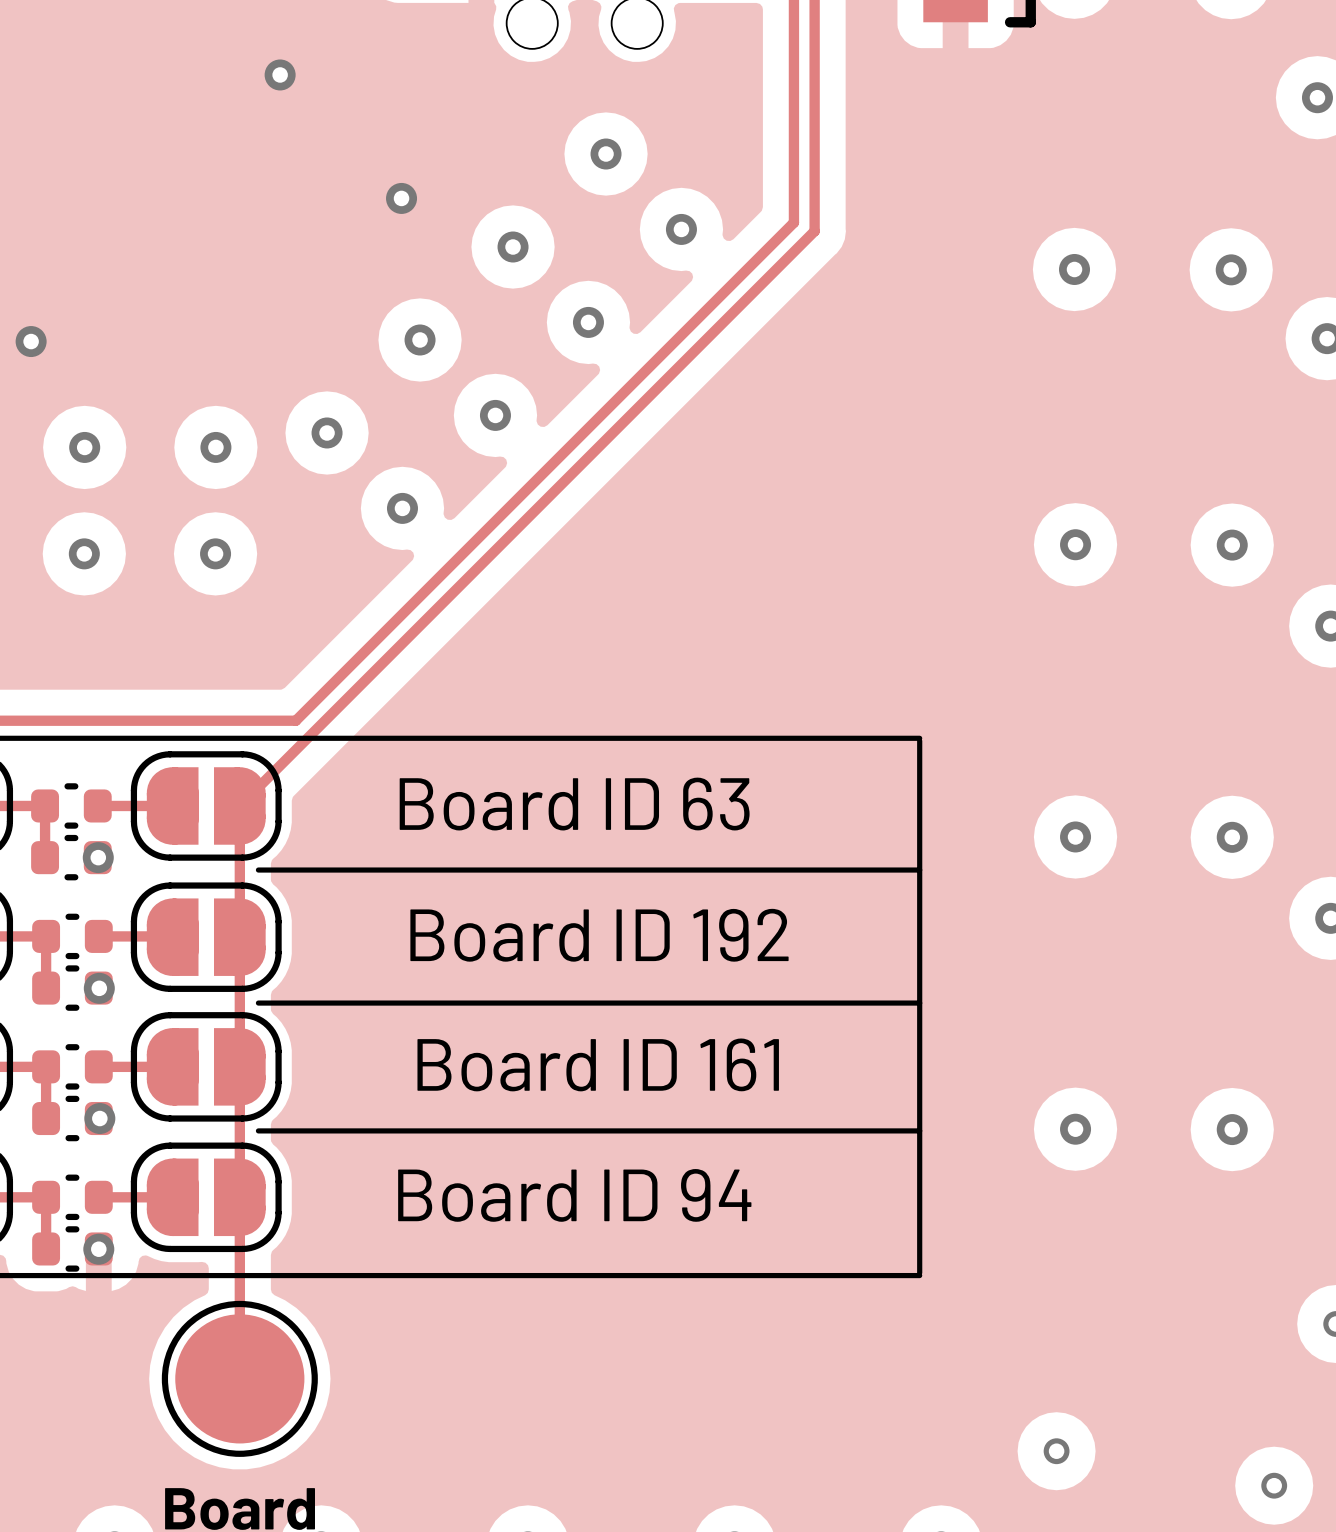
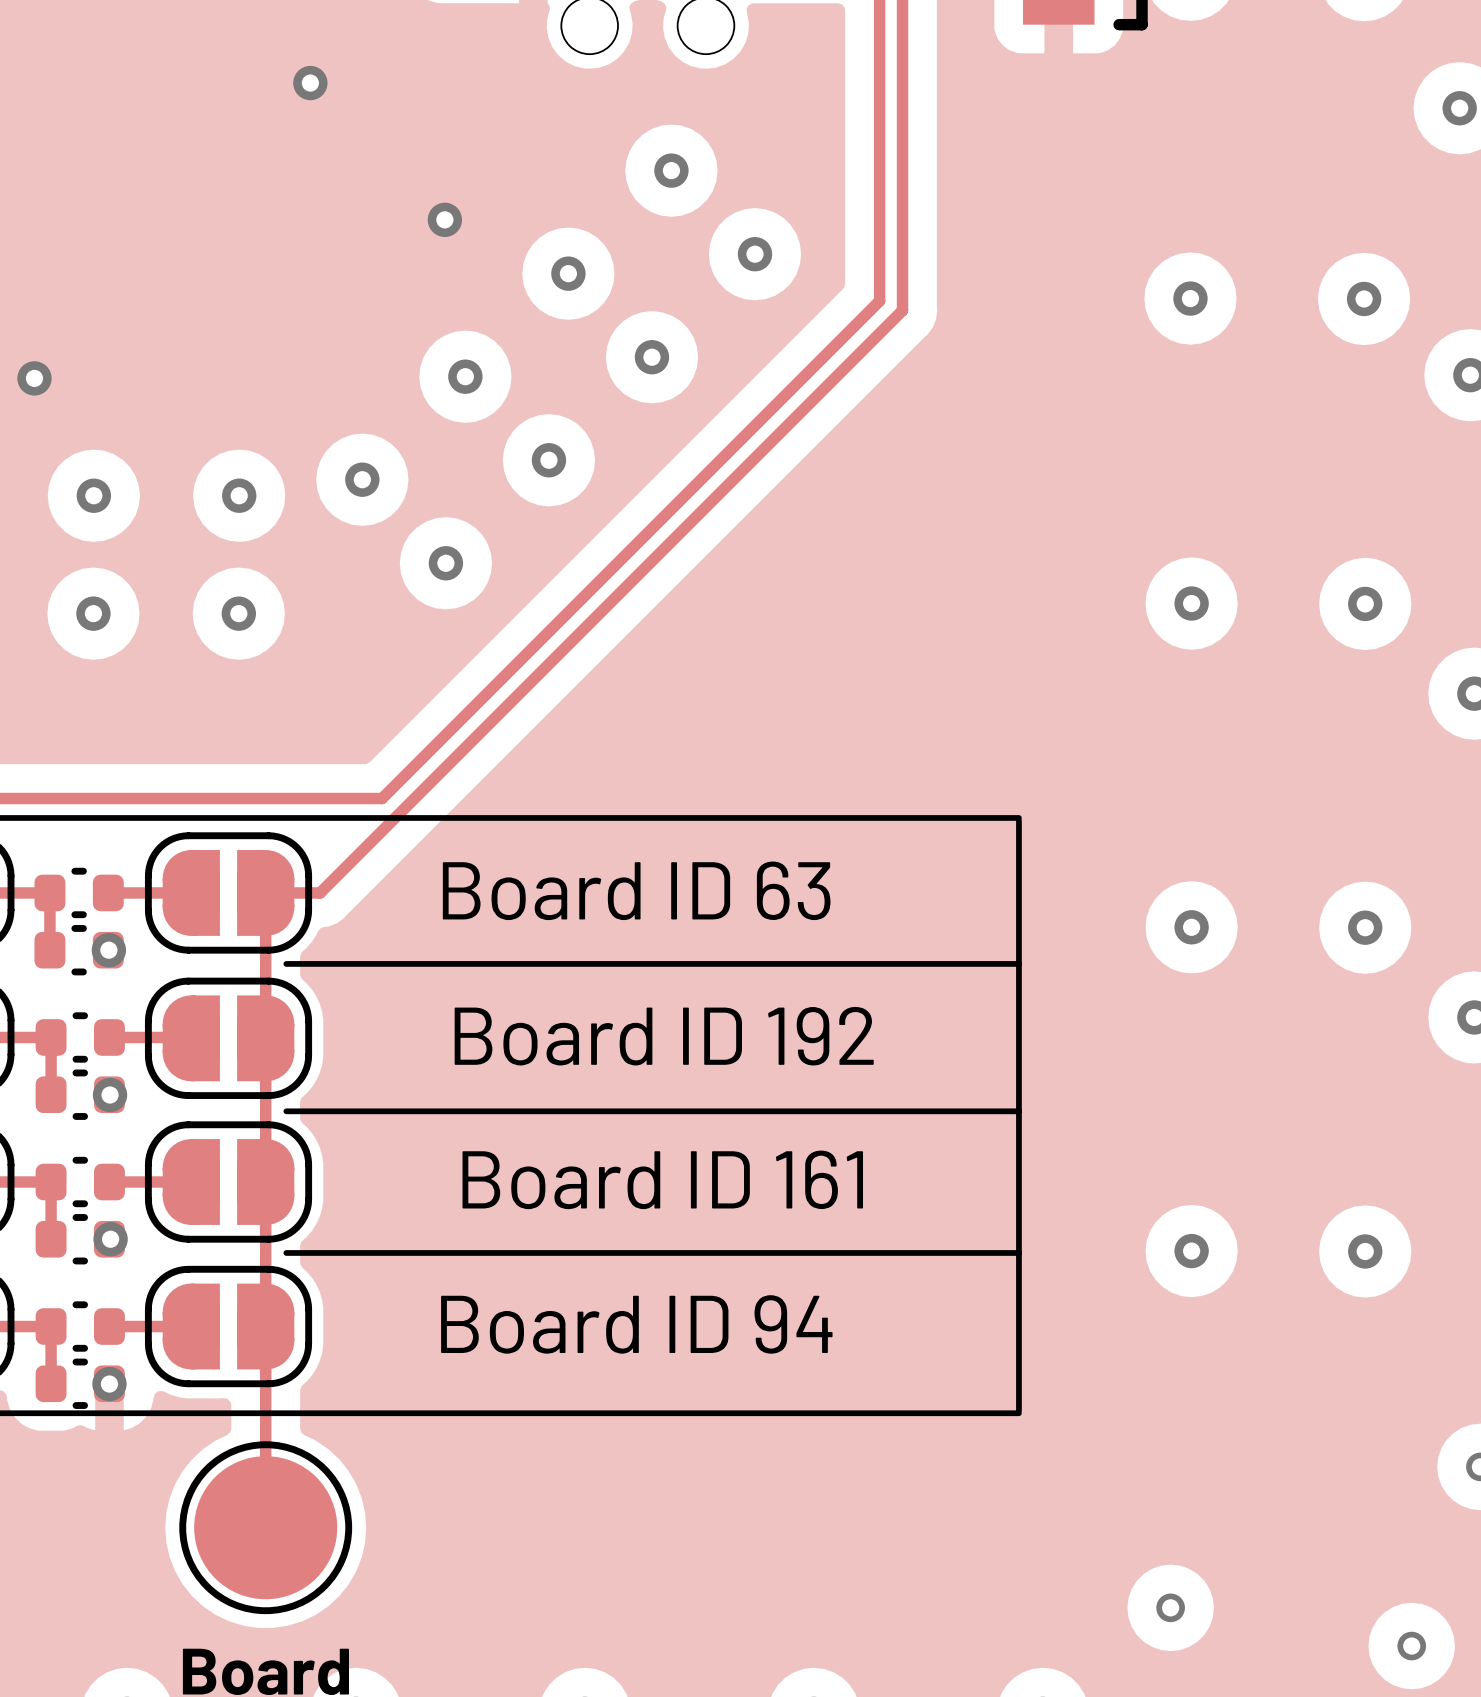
track: (793, 222) (295, 720) -> (879, 246) (879, 301) (382, 798) (327, 798)
track: (814, 231) (239, 805) -> (902, 256) (902, 310) (320, 892) (265, 892)

